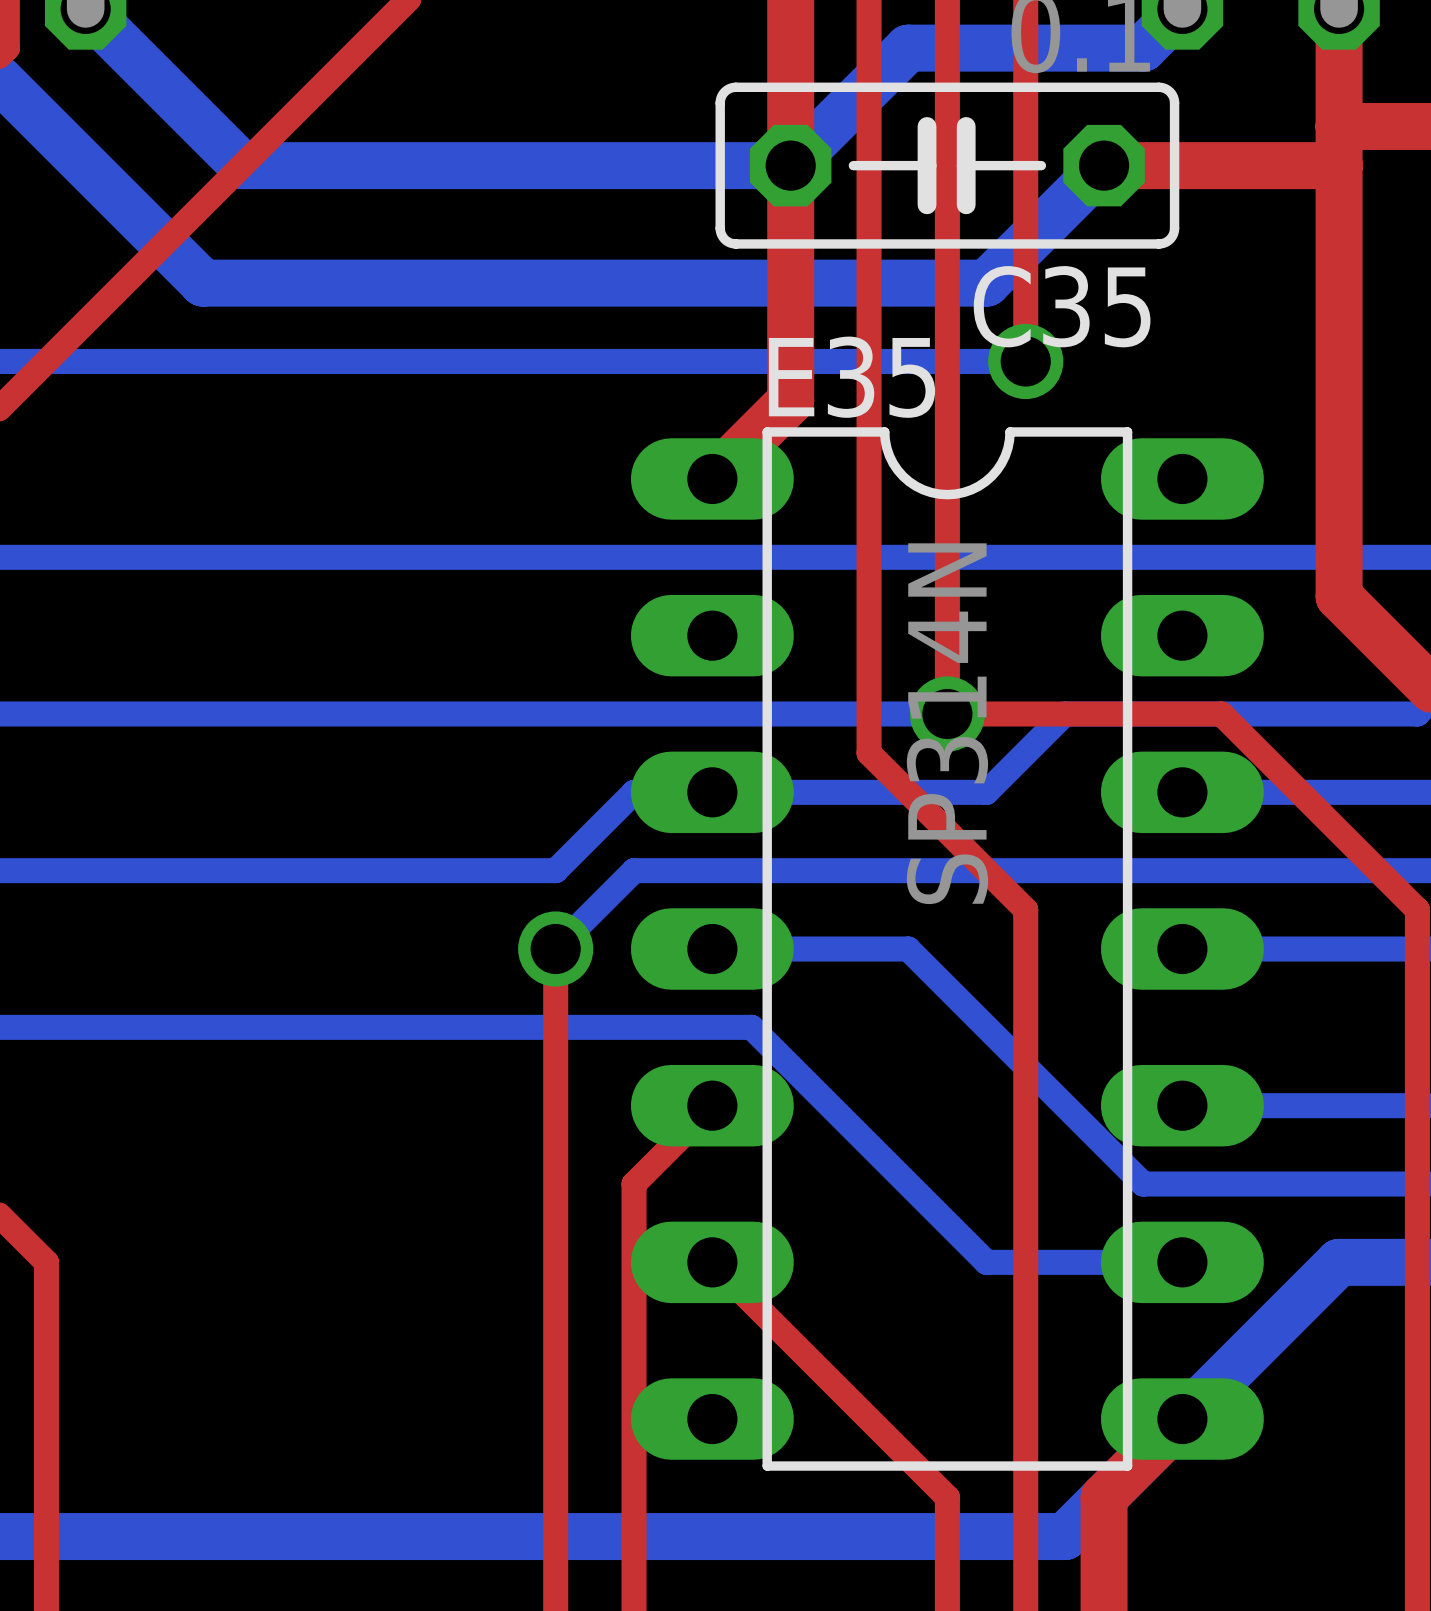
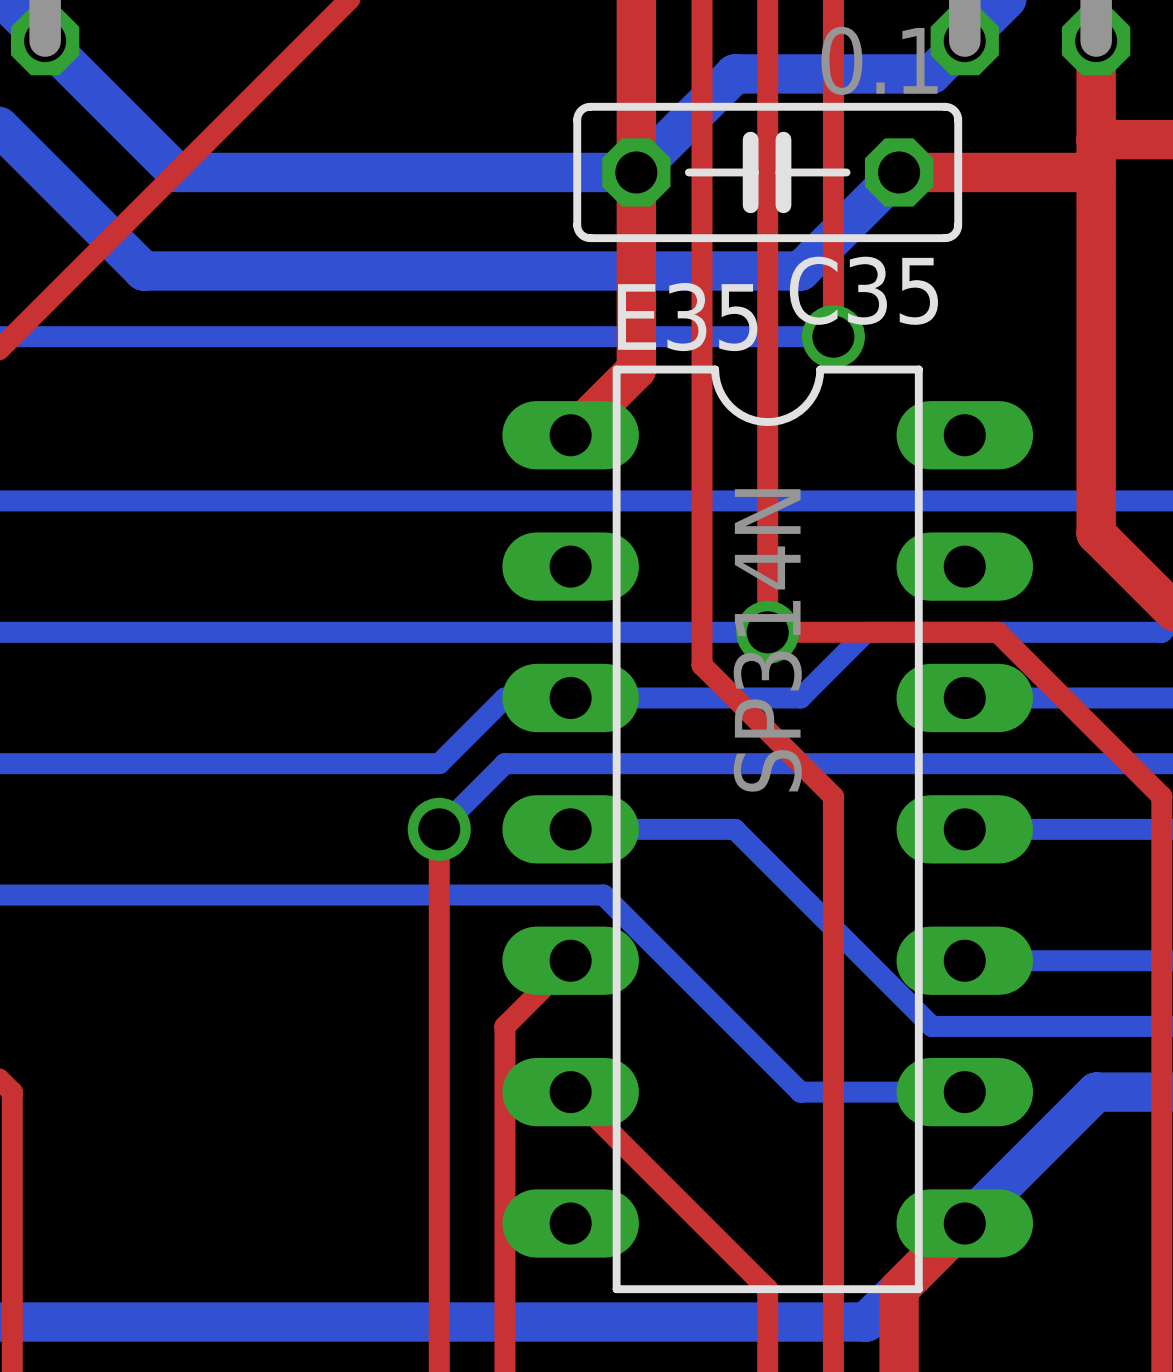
E35 name position: E35 (851, 377) -> E35 (687, 317)
E35 footprint: [630, 427, 1264, 1471] -> [502, 365, 1034, 1294]

